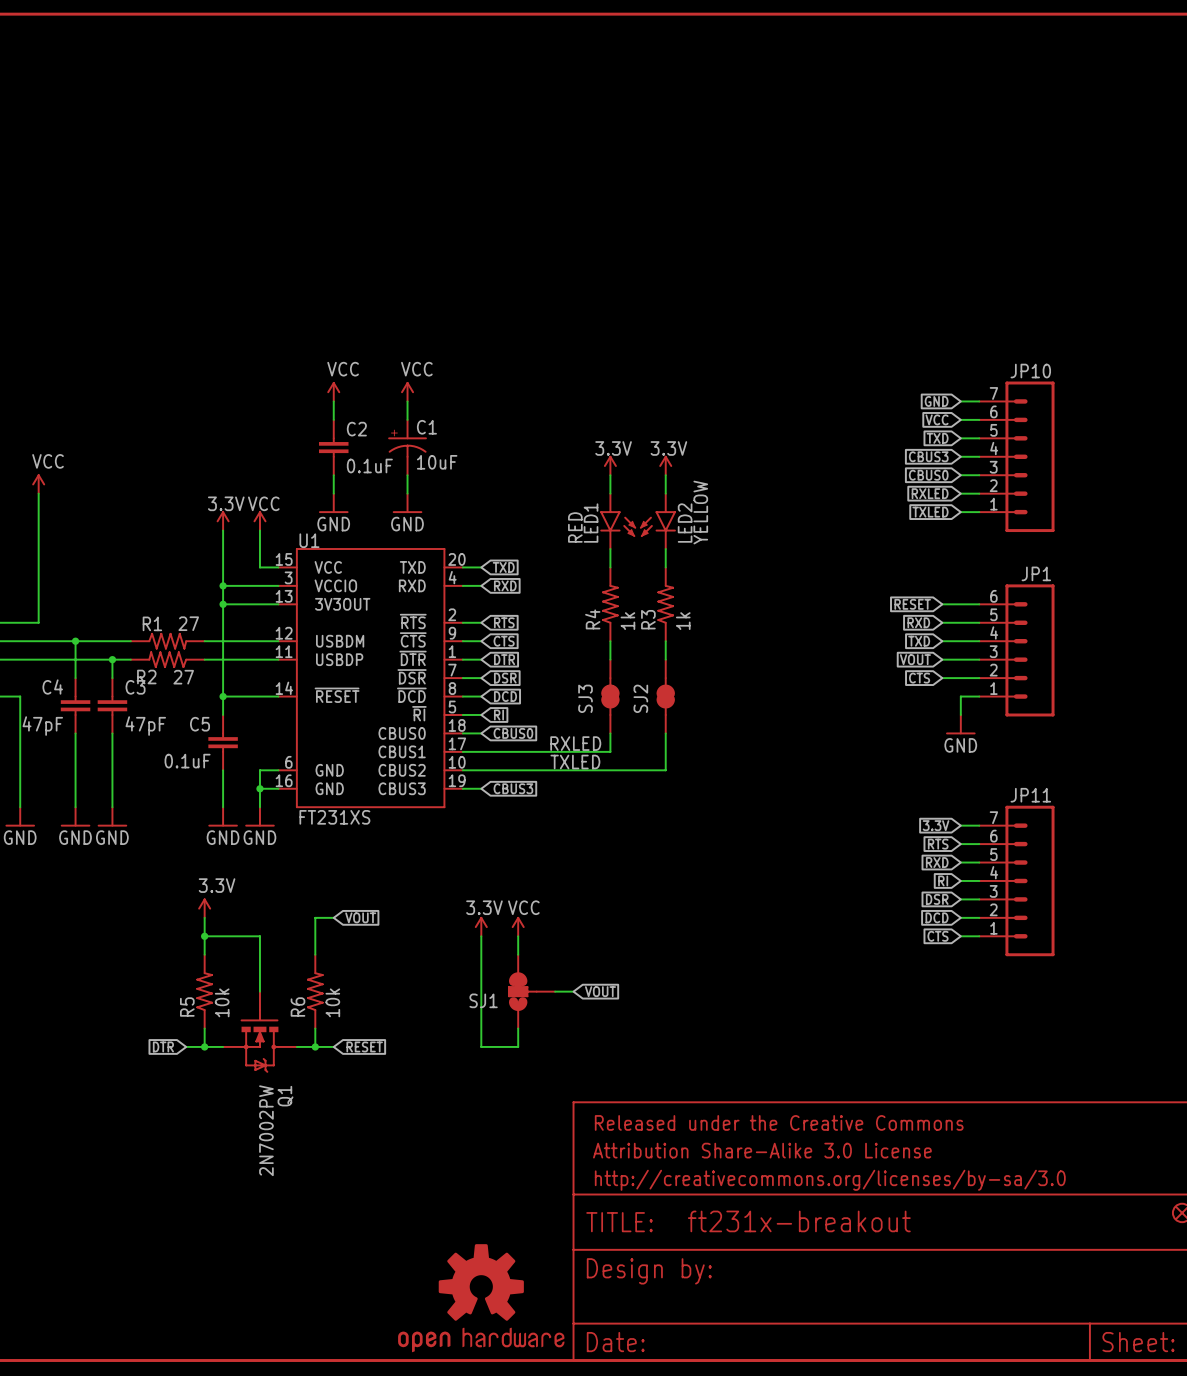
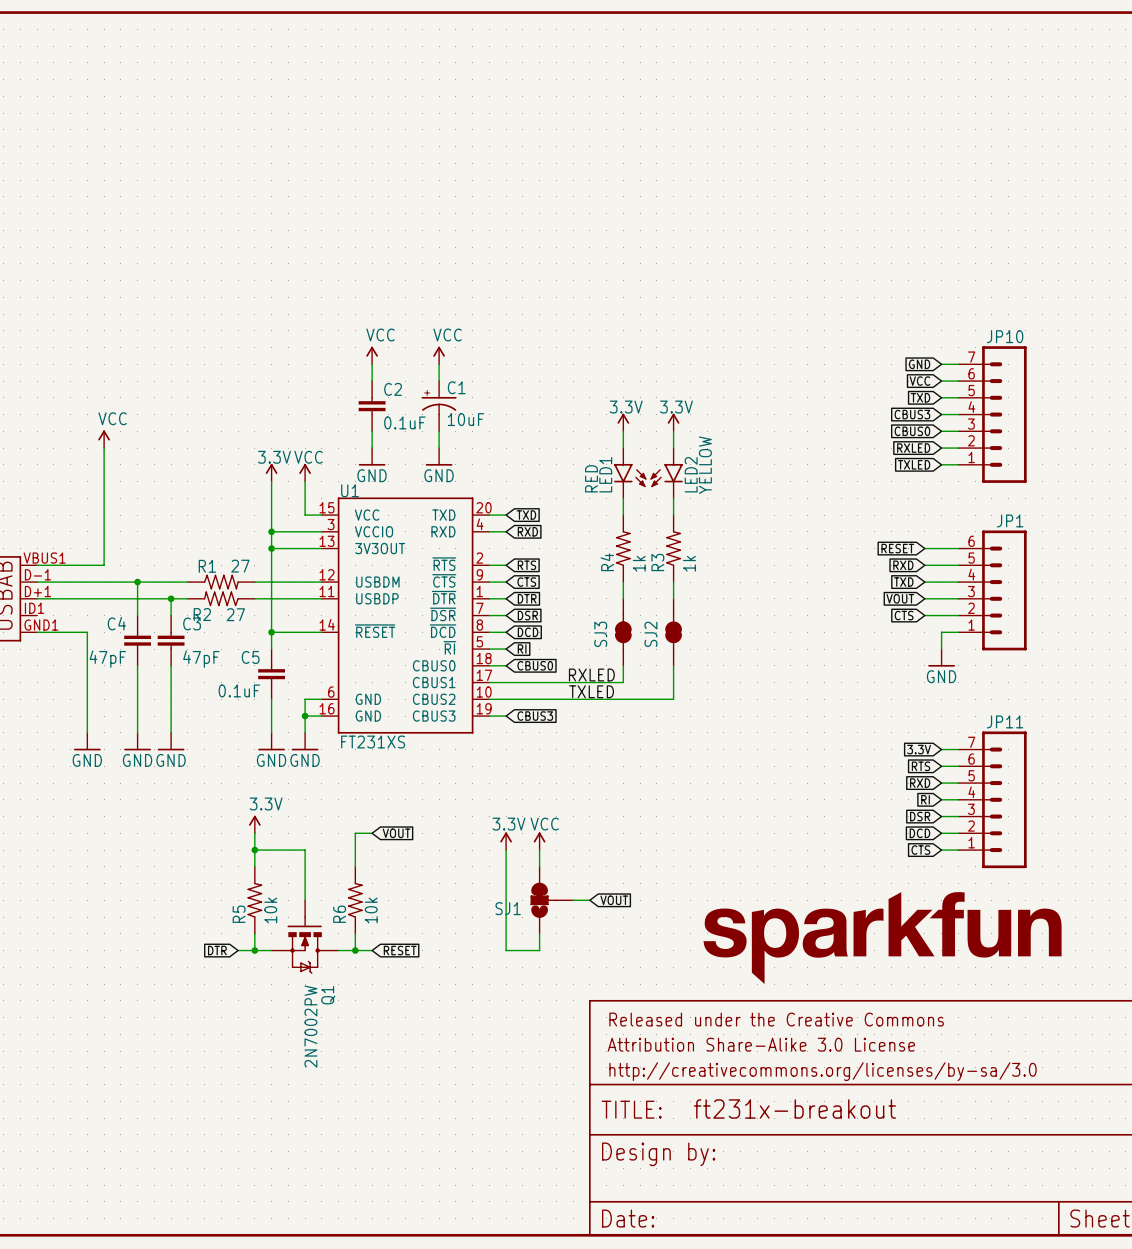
part: none -> (882, 938)
part: (481, 1298) -> none

